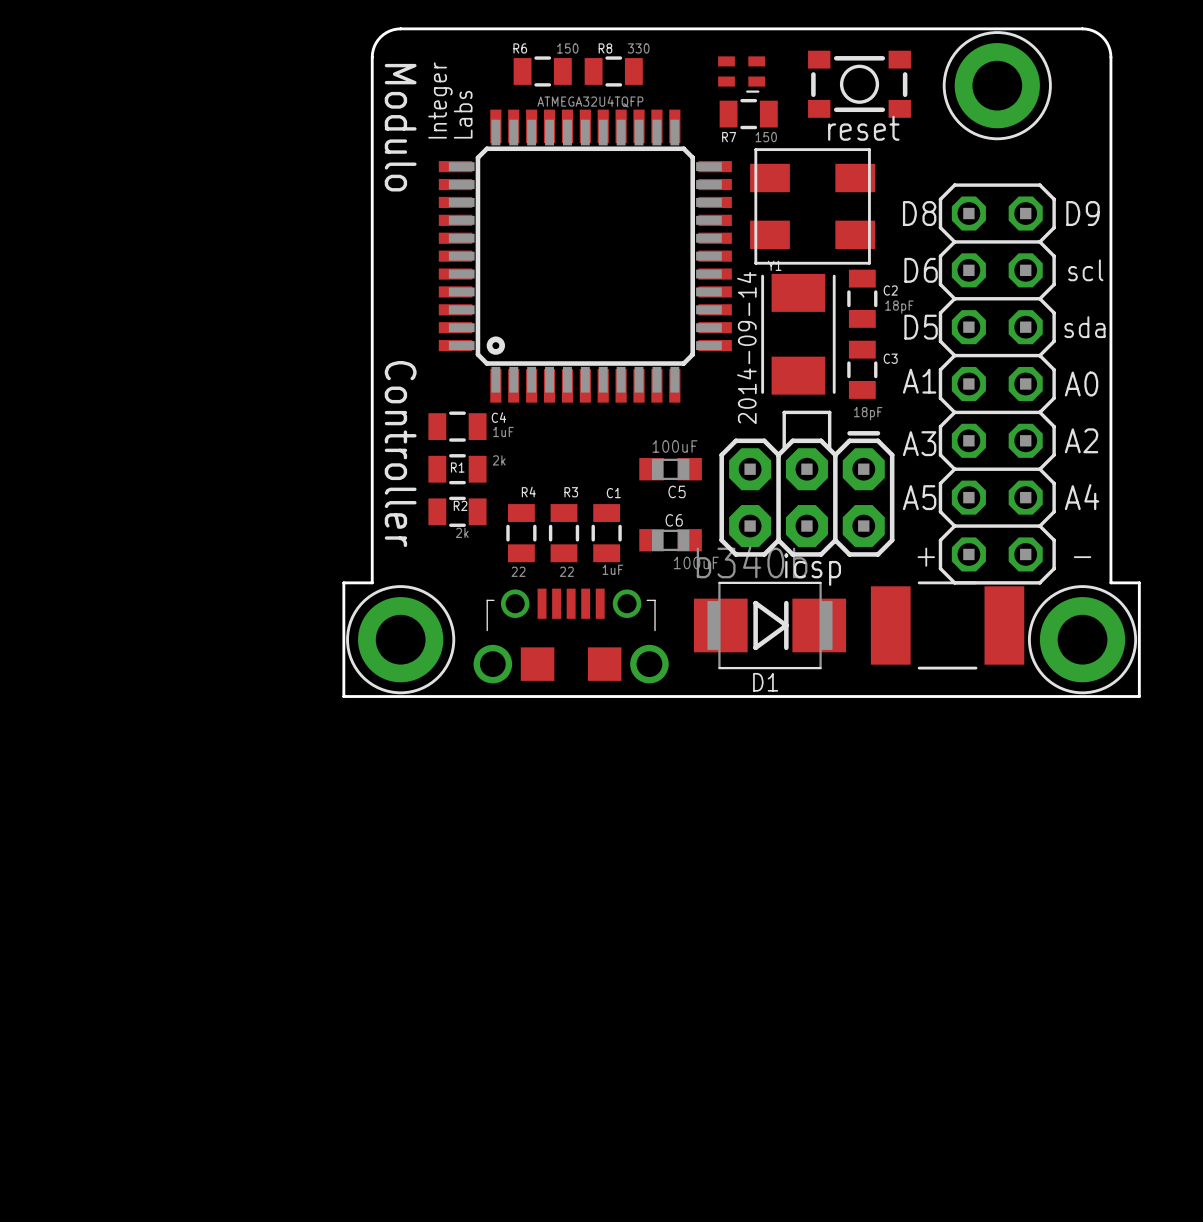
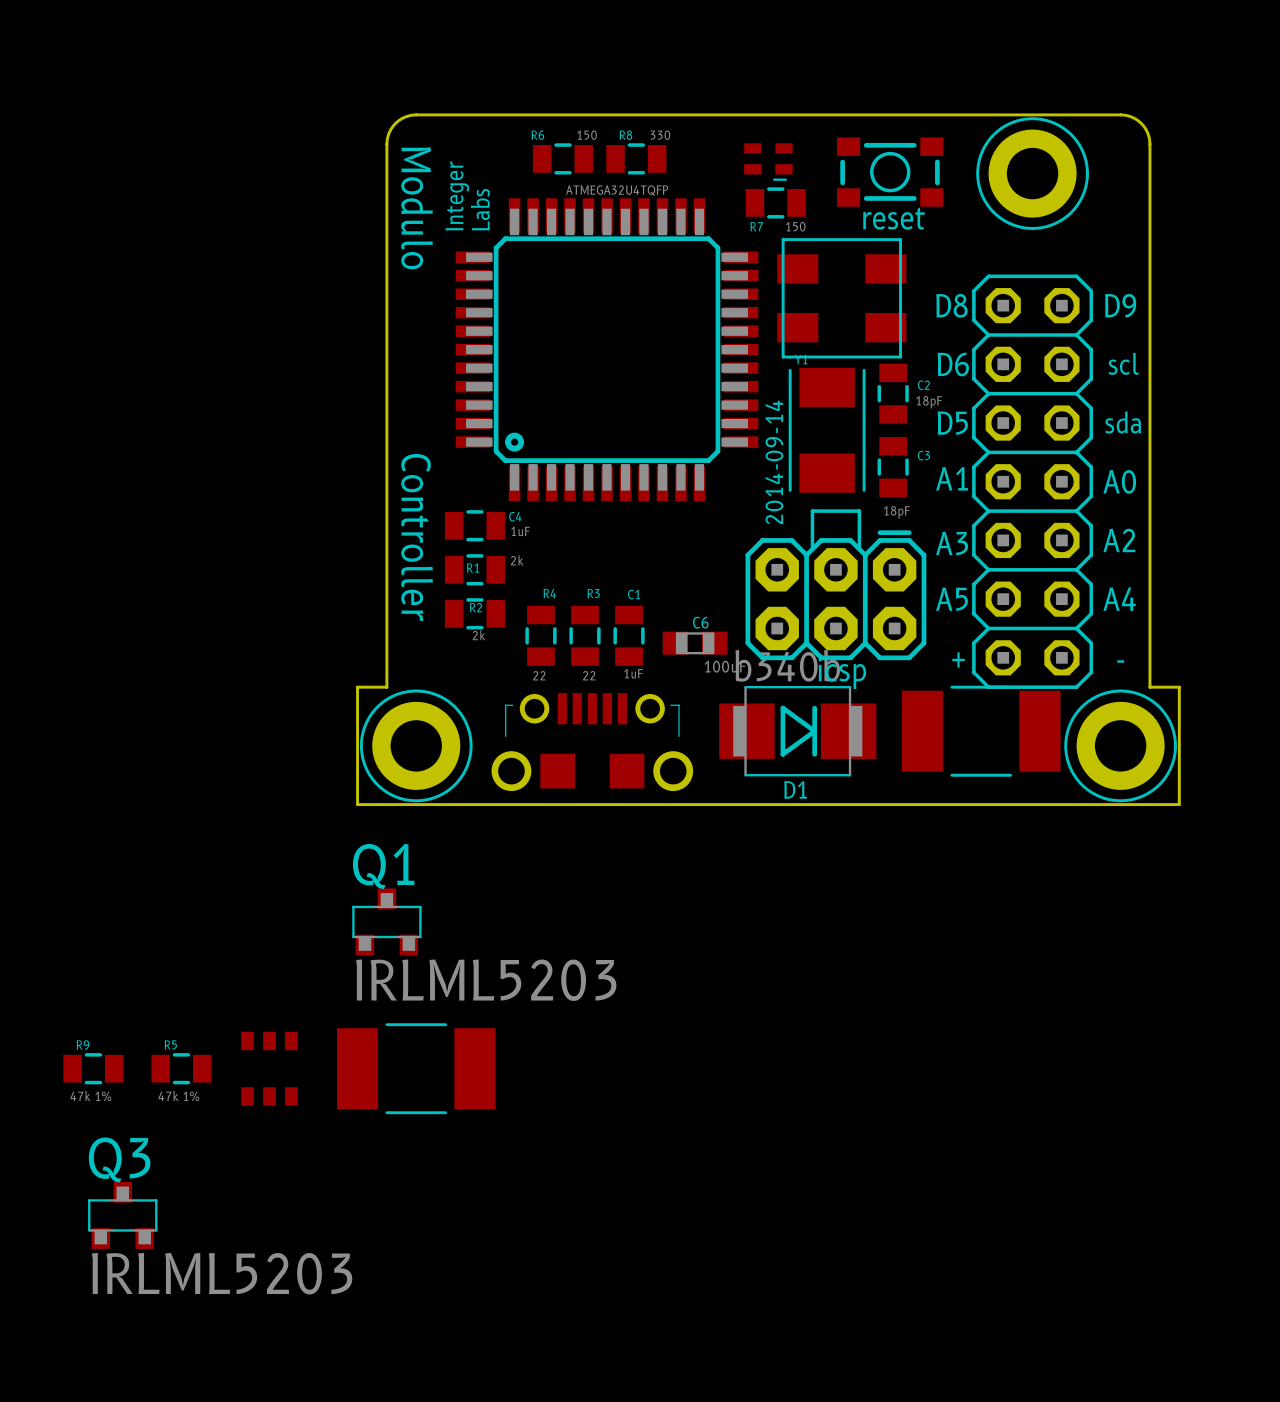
C5: 100uF (670, 469) -> none
Q1: none -> IRLML5203 (386, 921)
R9: none -> 47k 1% (93, 1068)
R5: none -> 47k 1% (181, 1068)
part: none -> (269, 1068)
part: none -> (416, 1068)
Q3: none -> IRLML5203 (122, 1215)

